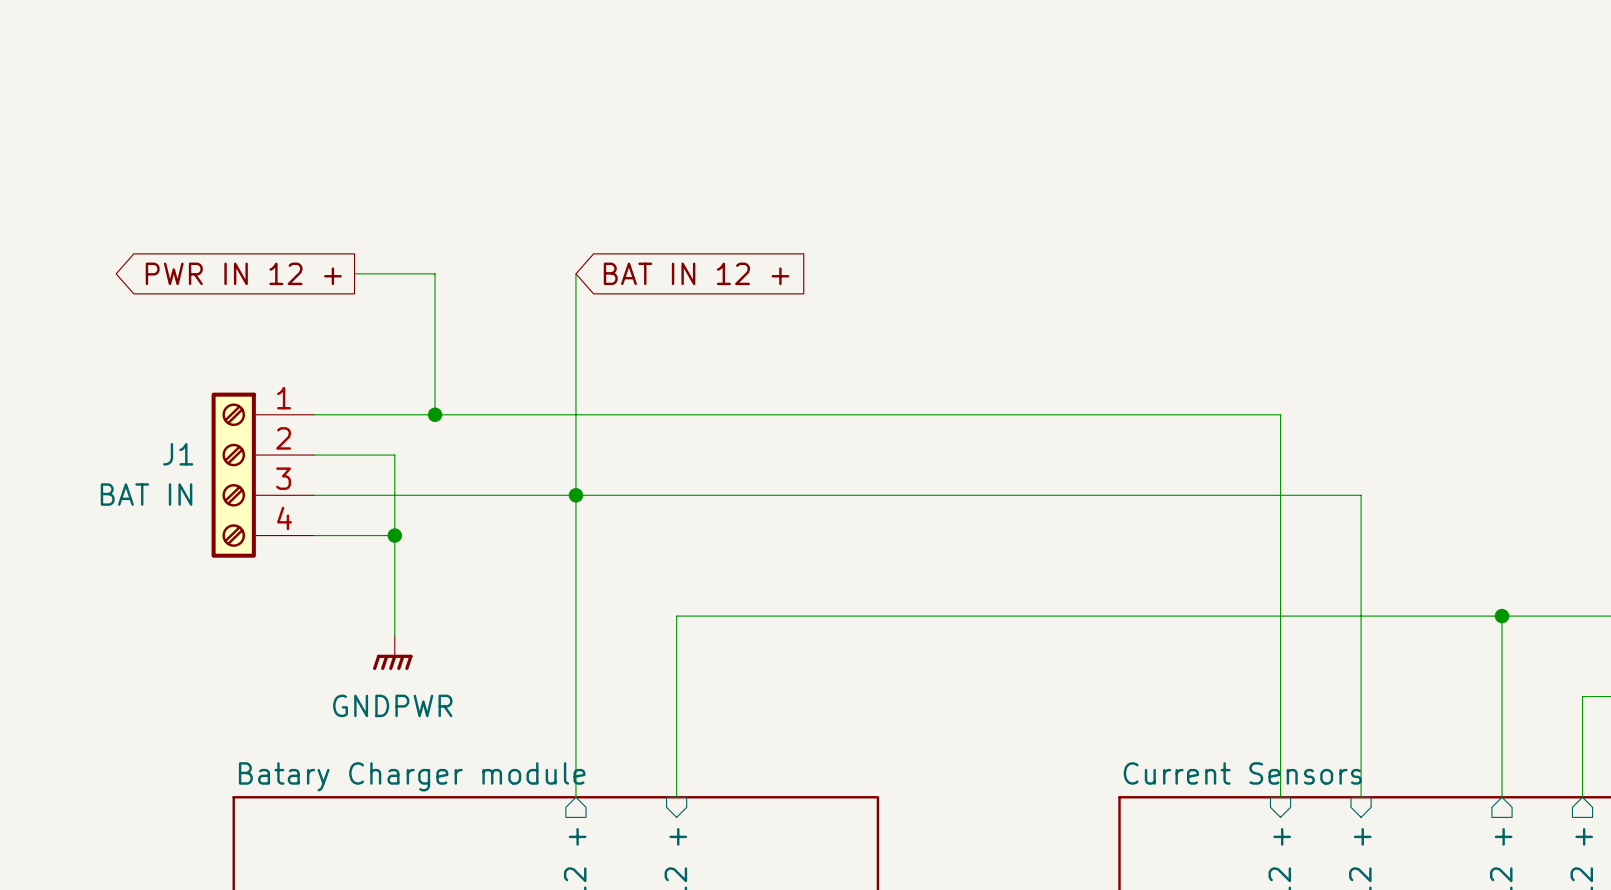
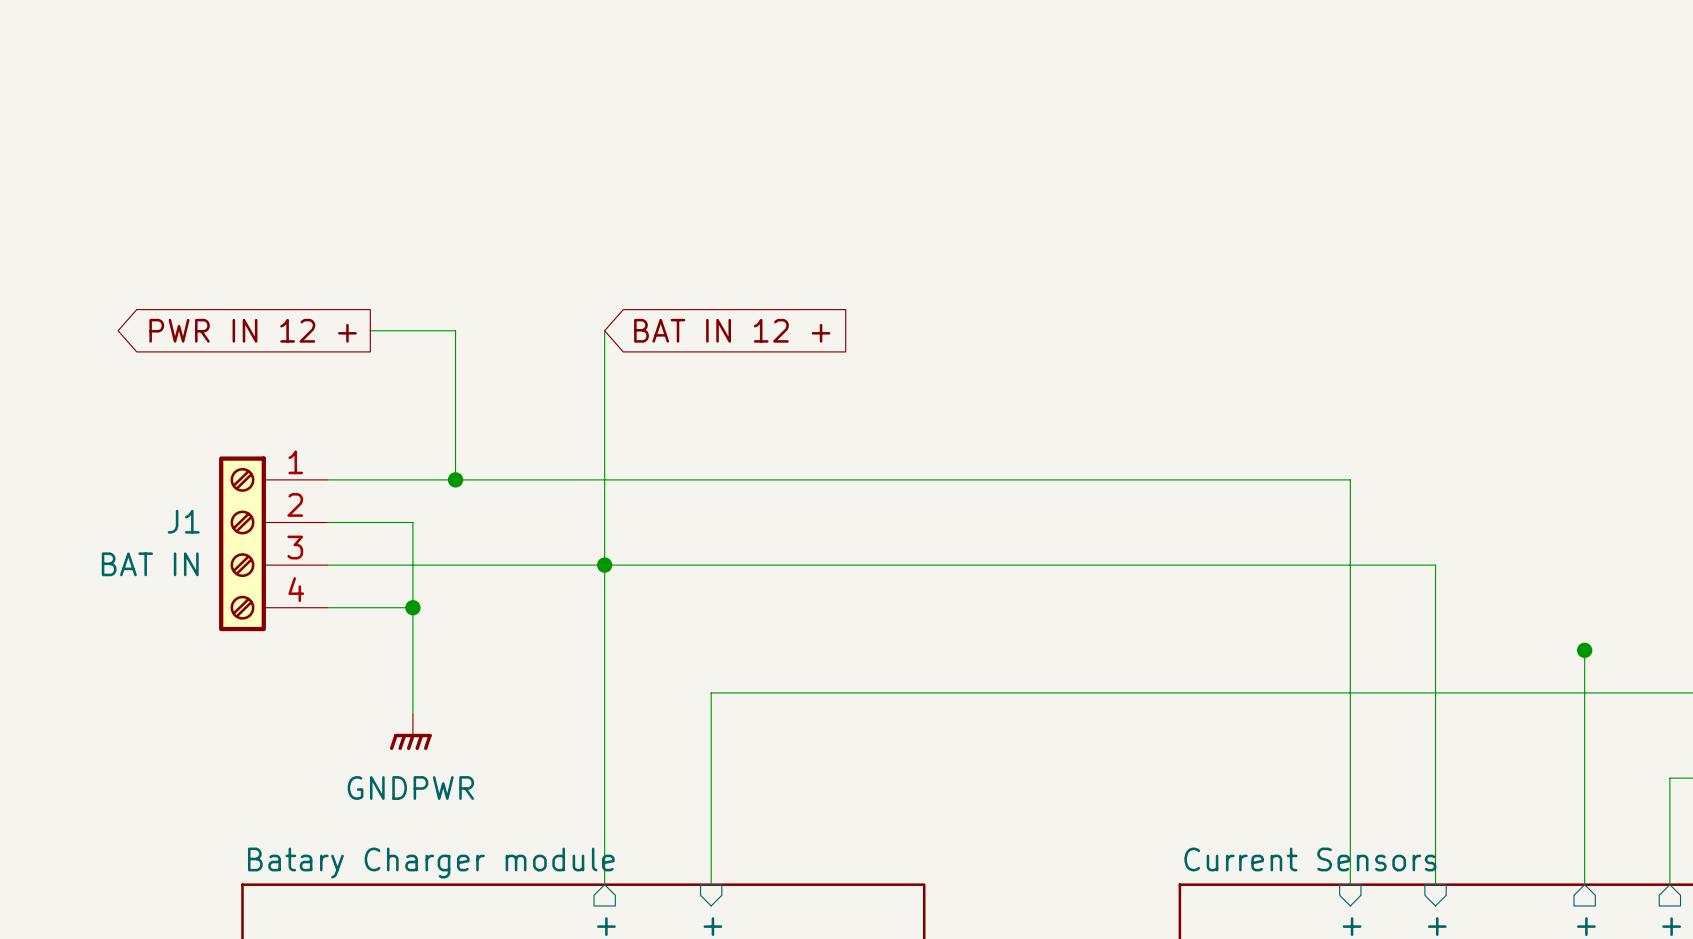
wire: none -> (1584, 650) (1584, 692)
junction position: (1501, 616) -> (1584, 650)

